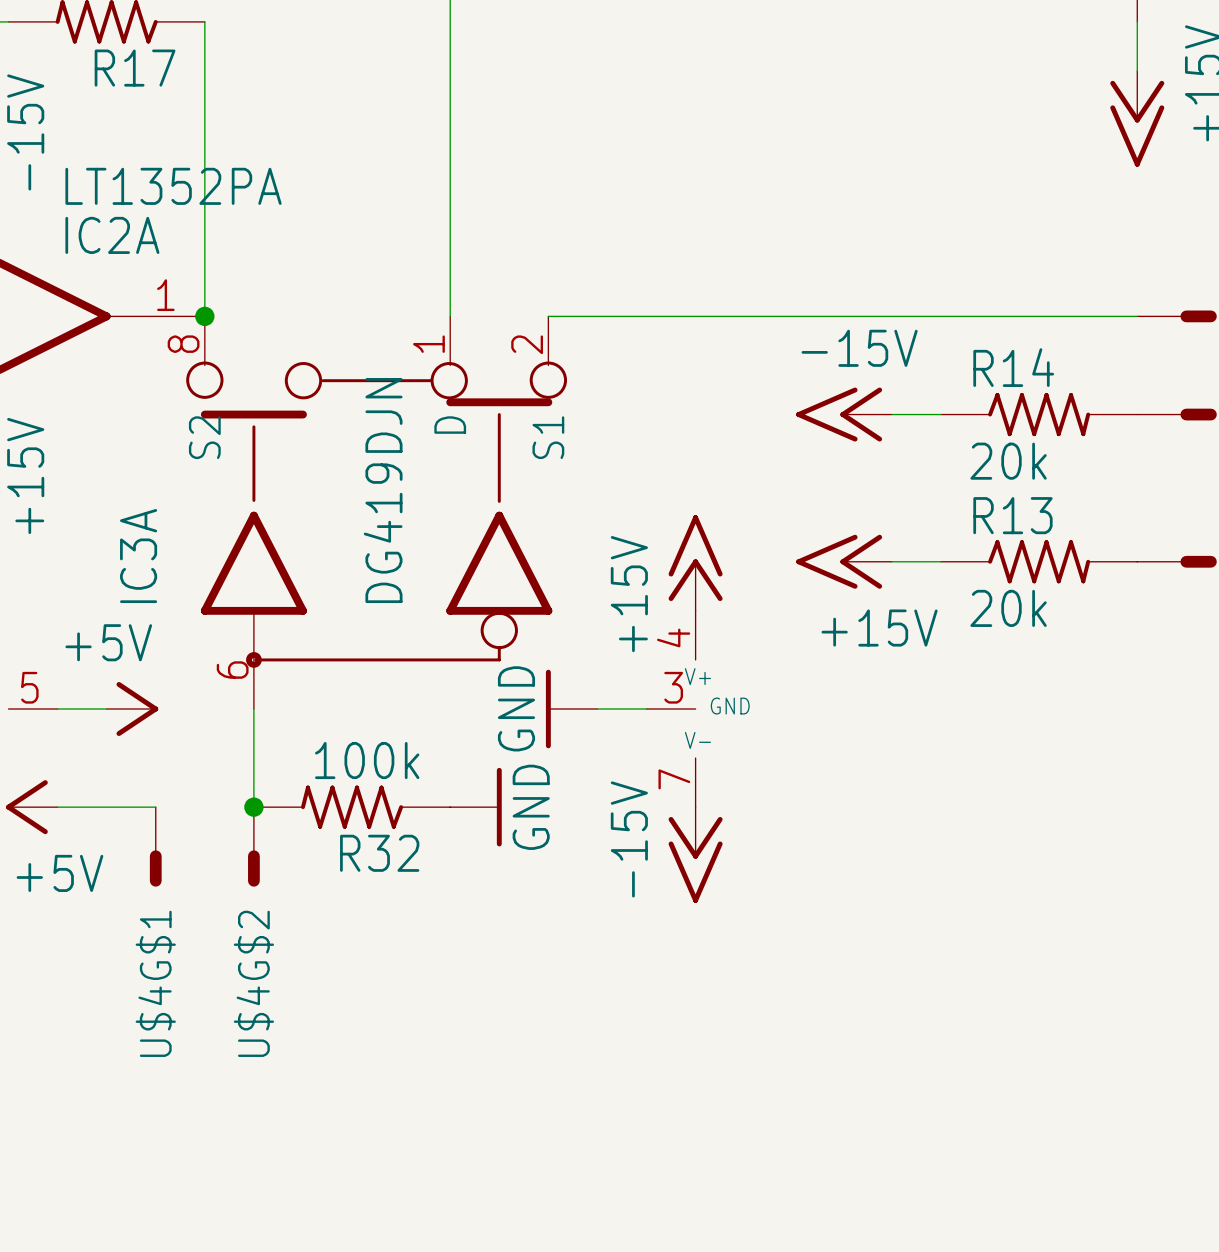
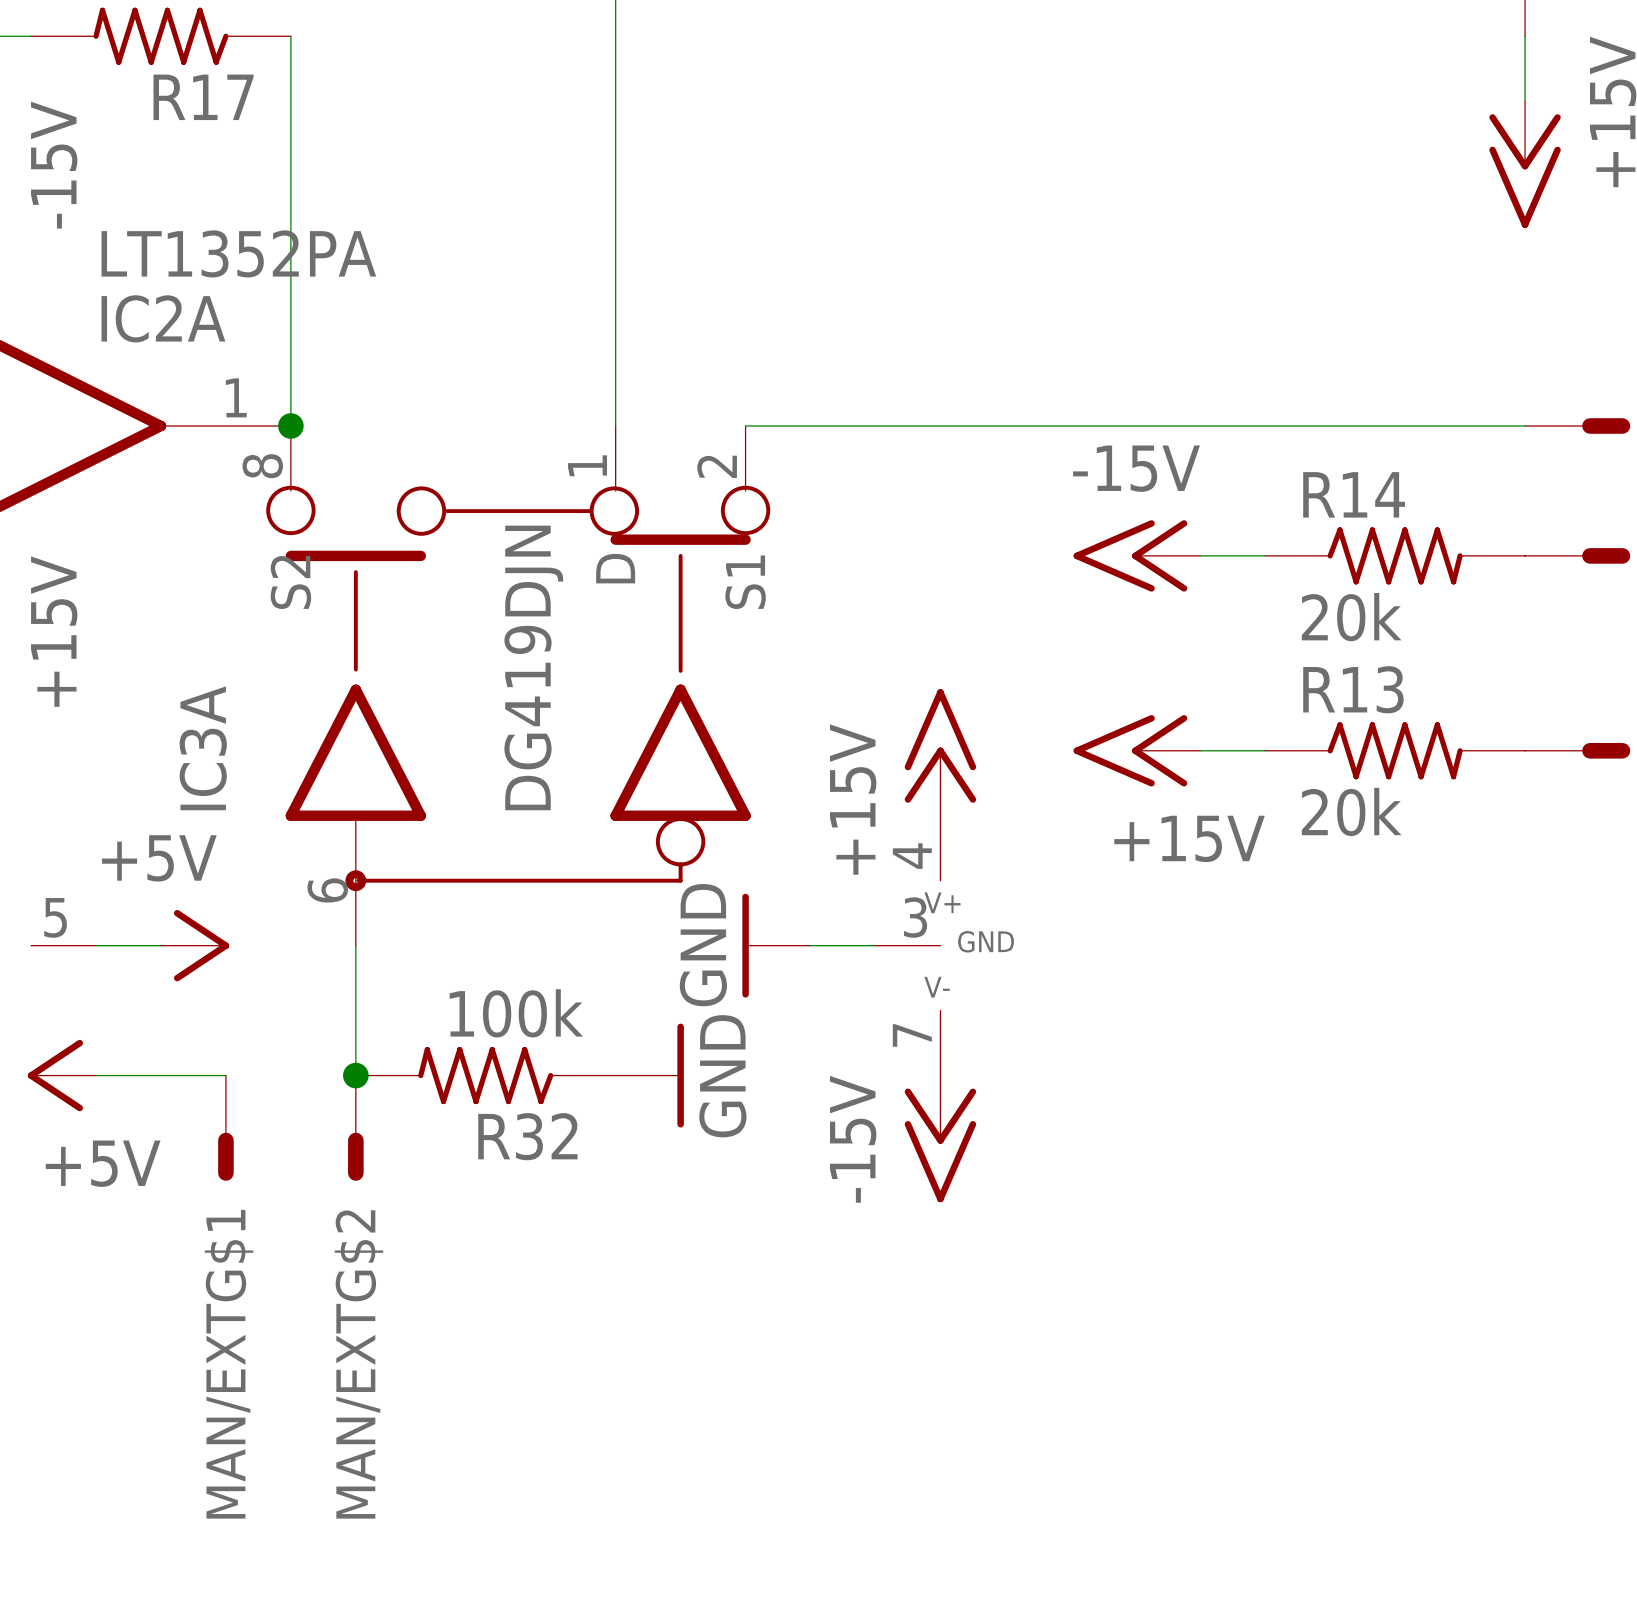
U$4G$1 name: U$4G$1 (155, 983) -> MAN/EXTG$1 (229, 1364)
U$4G$2 name: U$4G$2 (253, 983) -> MAN/EXTG$2 (358, 1364)

